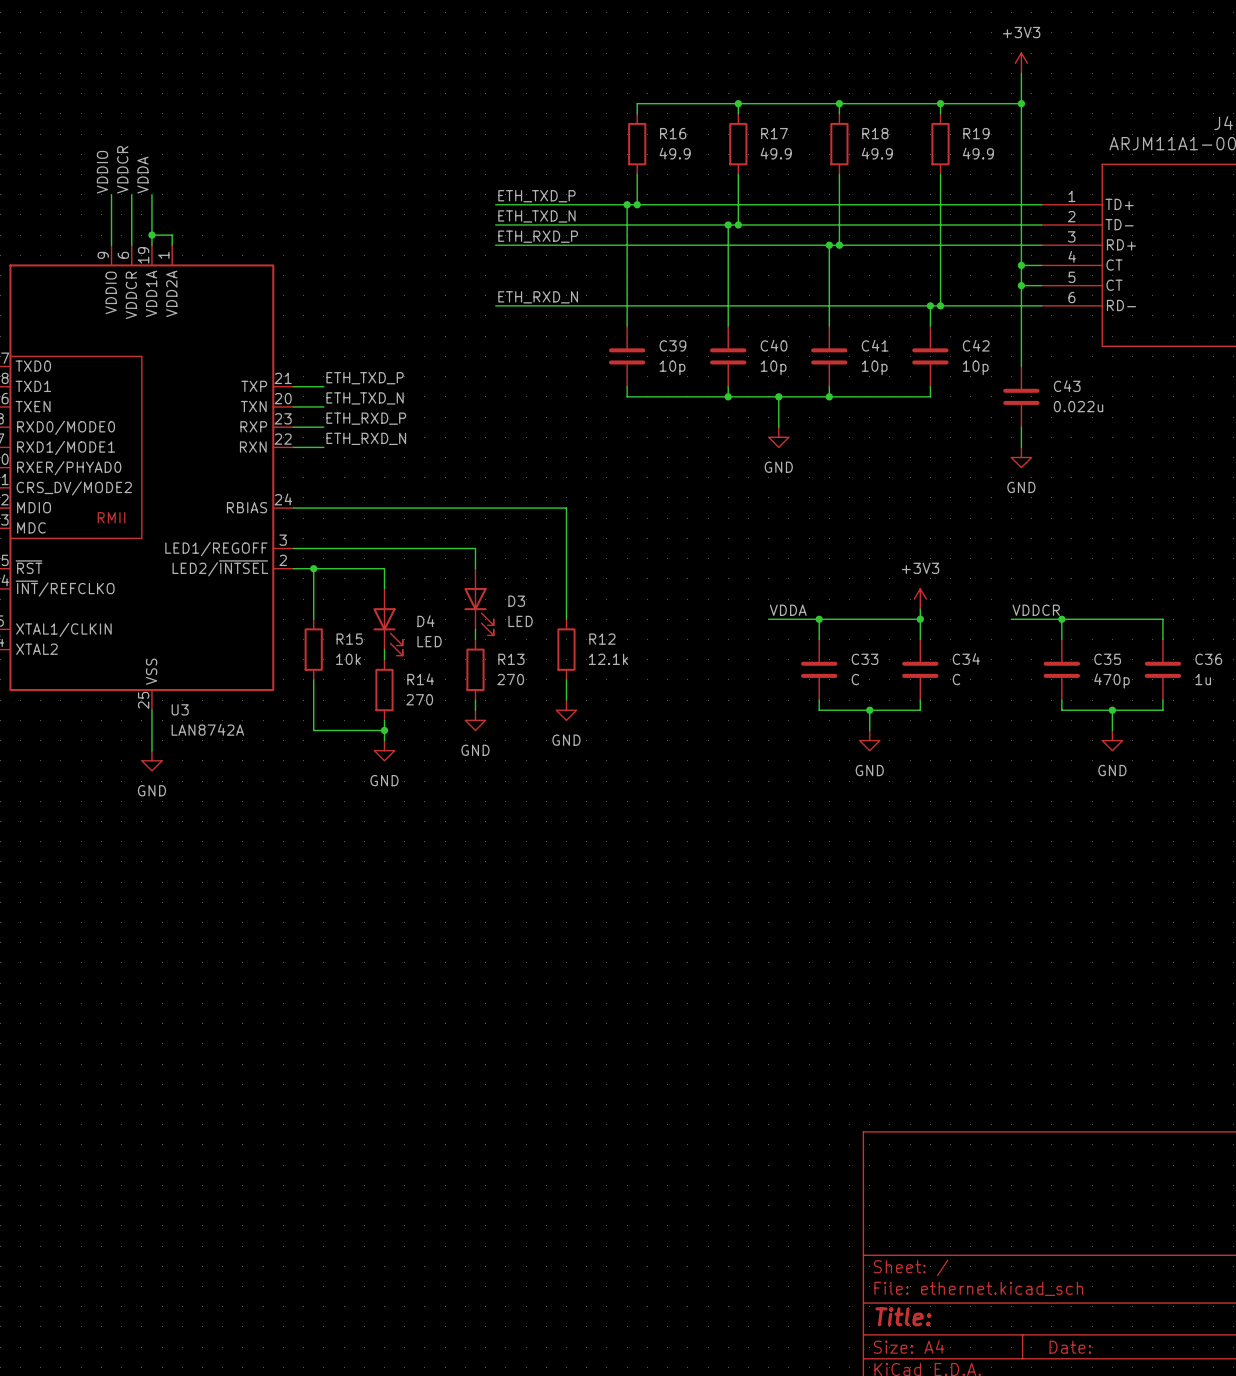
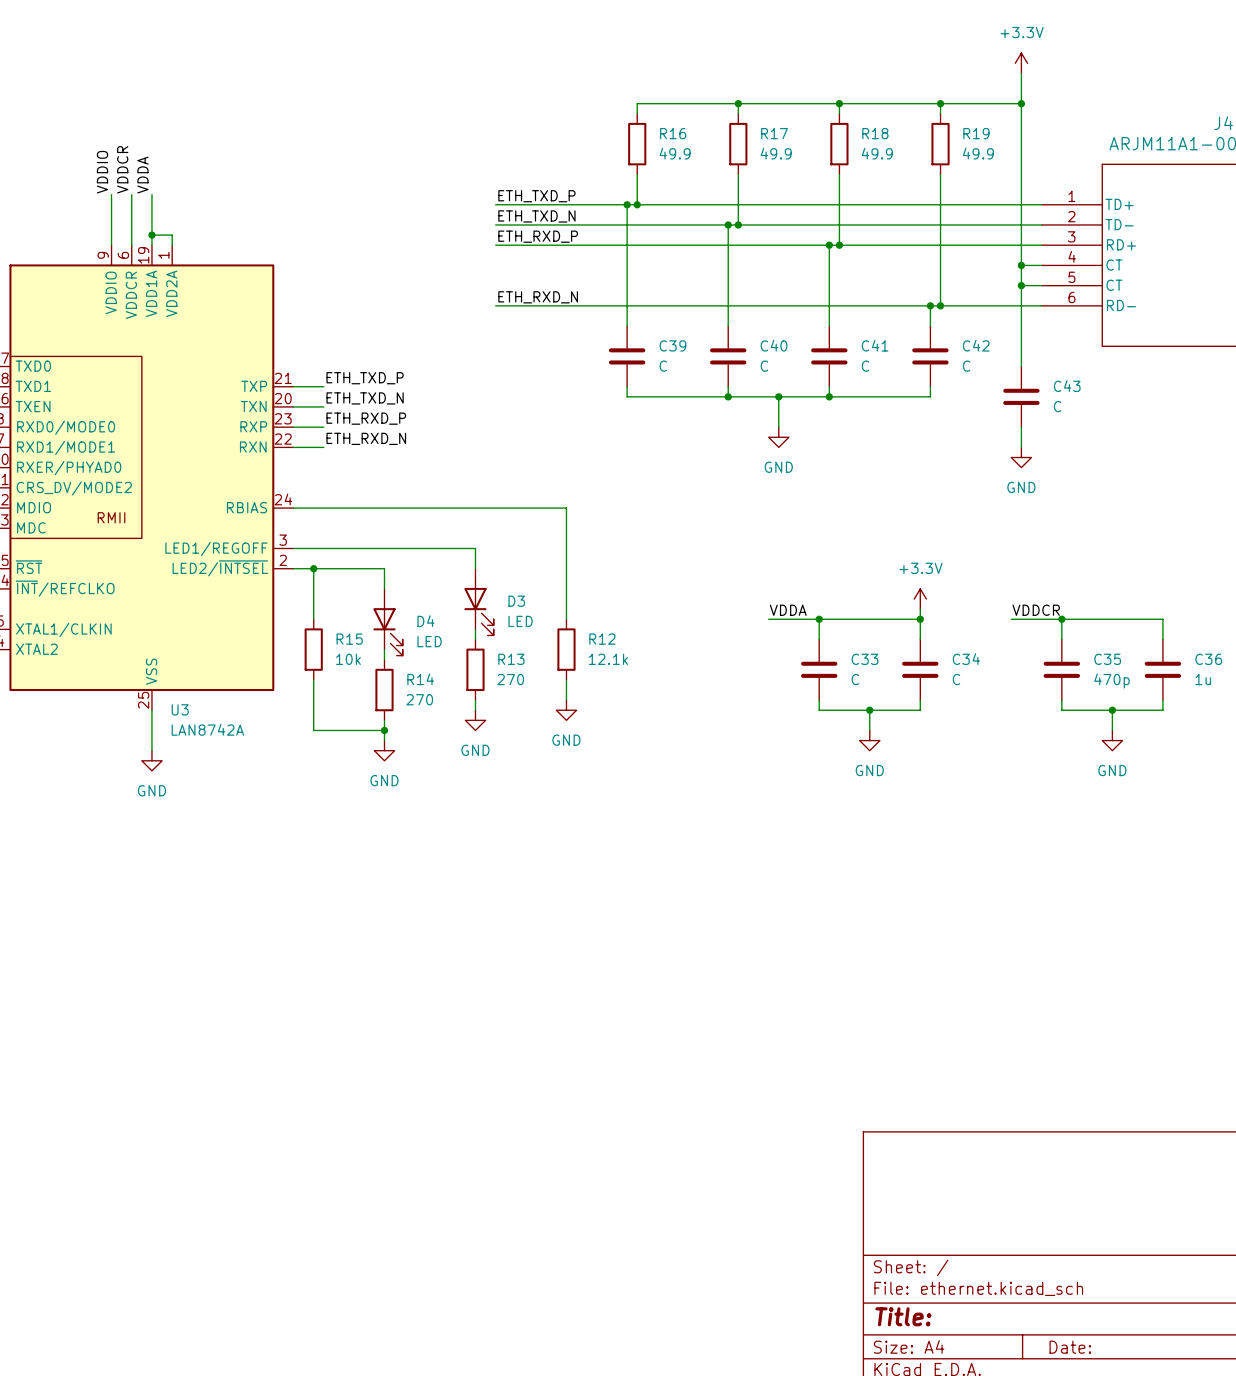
power symbol: +3V3 (1021, 63) -> +3.3V (1021, 63)
C39 value: 10p (672, 367) -> C (663, 366)
C40 value: 10p (773, 367) -> C (764, 366)
C41 value: 10p (874, 367) -> C (865, 366)
C42 value: 10p (975, 367) -> C (966, 366)
C43 value: 0.022u (1078, 406) -> C (1057, 406)
power symbol: +3V3 (920, 599) -> +3.3V (920, 599)

